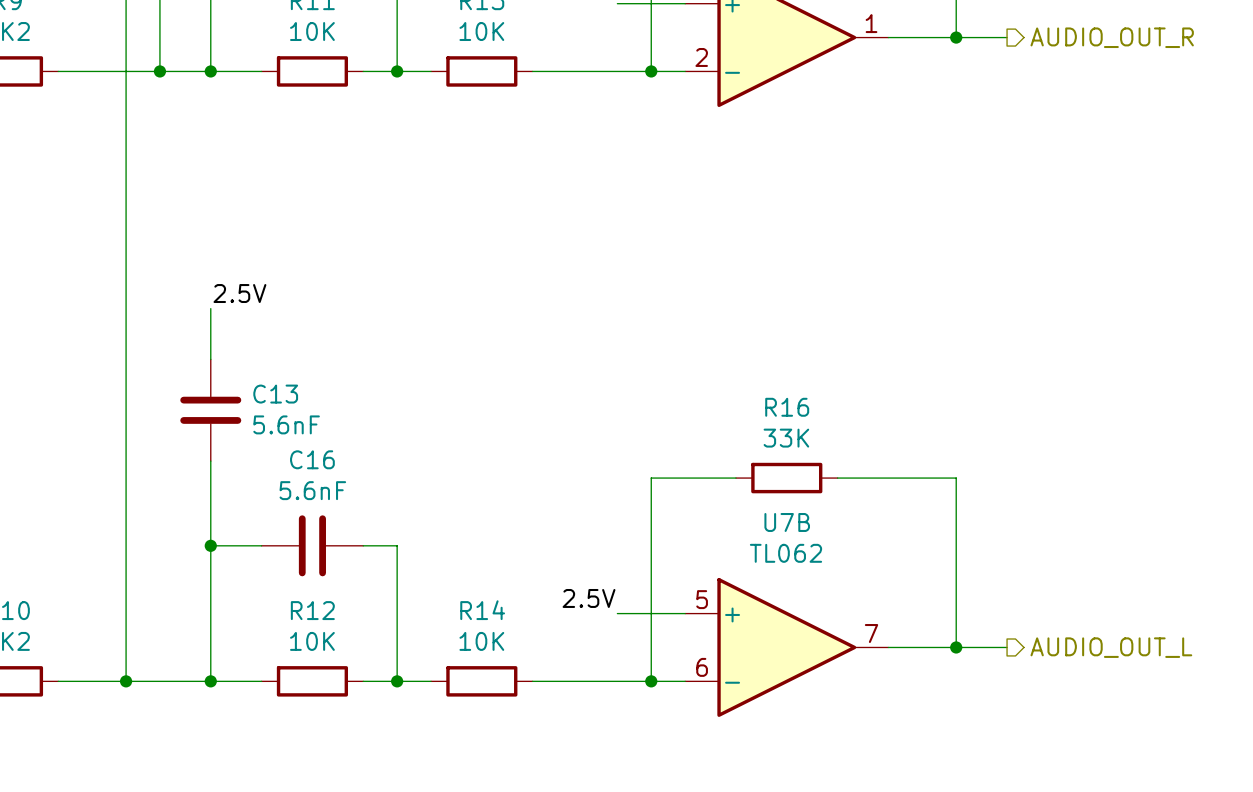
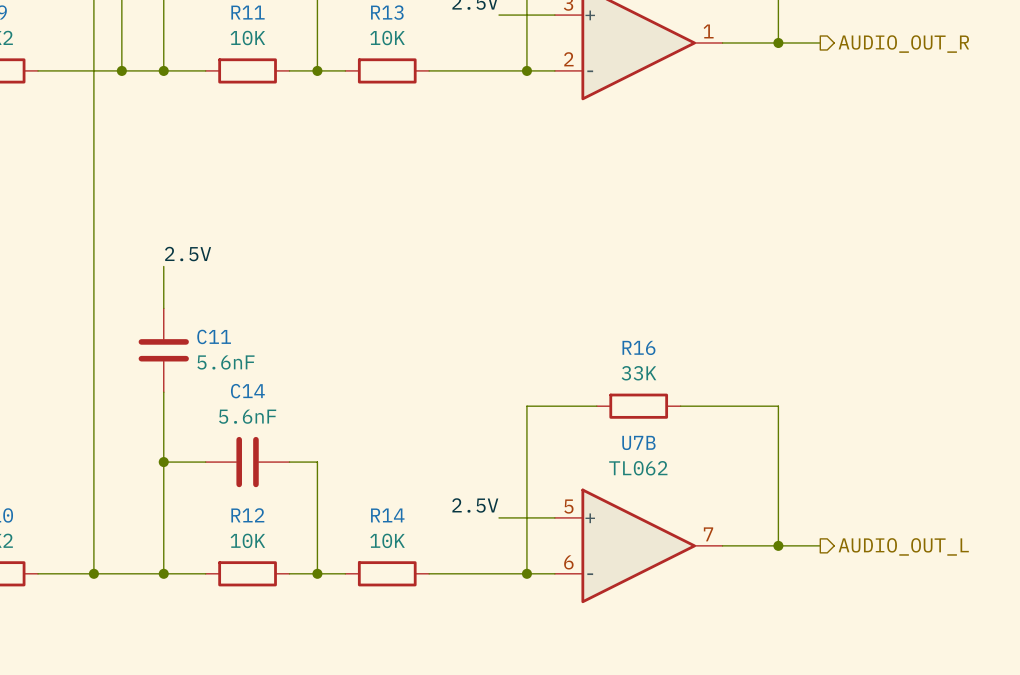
C13 name: C13 (275, 394) -> C11 (214, 336)
C16 name: C16 (312, 459) -> C14 (247, 391)

